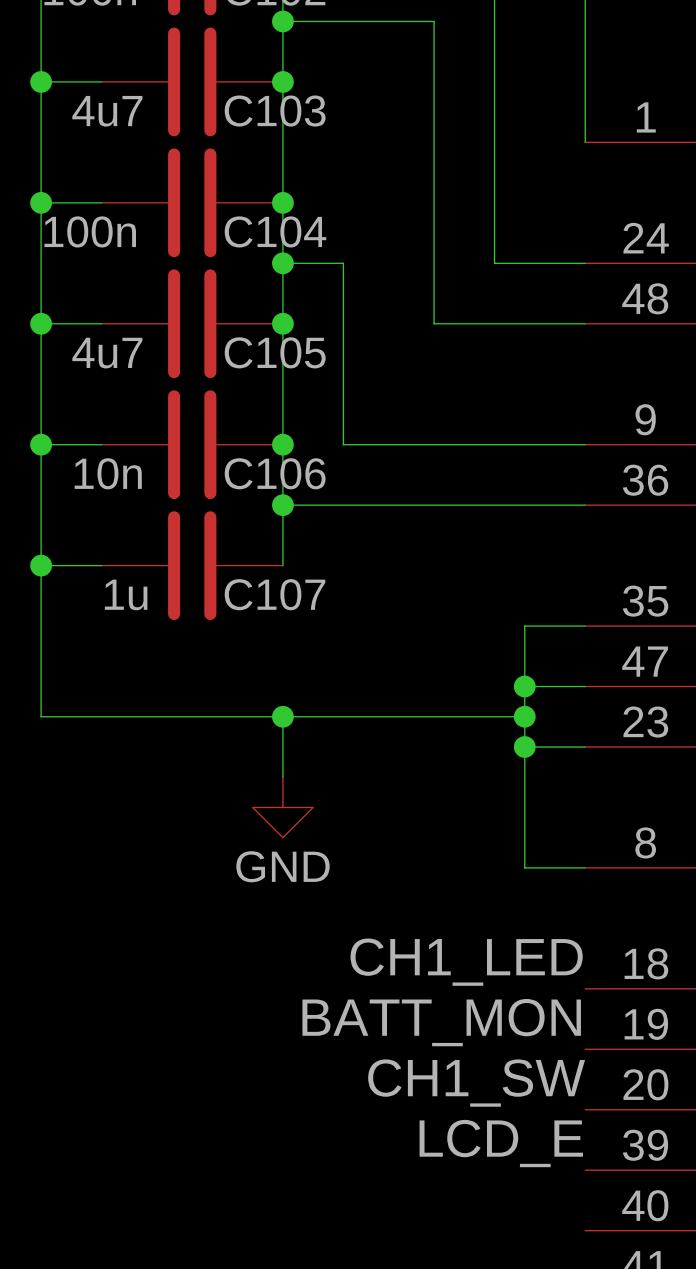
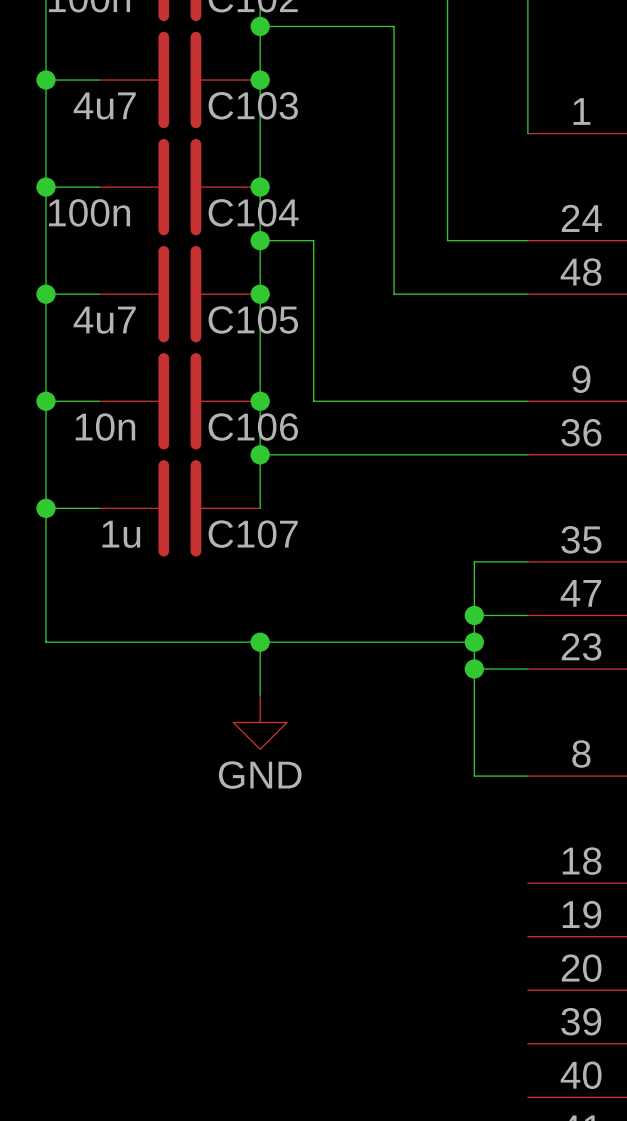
label: CH1_LED (466, 962) -> none
label: BATT_MON (441, 1022) -> none
label: CH1_SW (476, 1083) -> none
label: LCD_E (501, 1143) -> none

